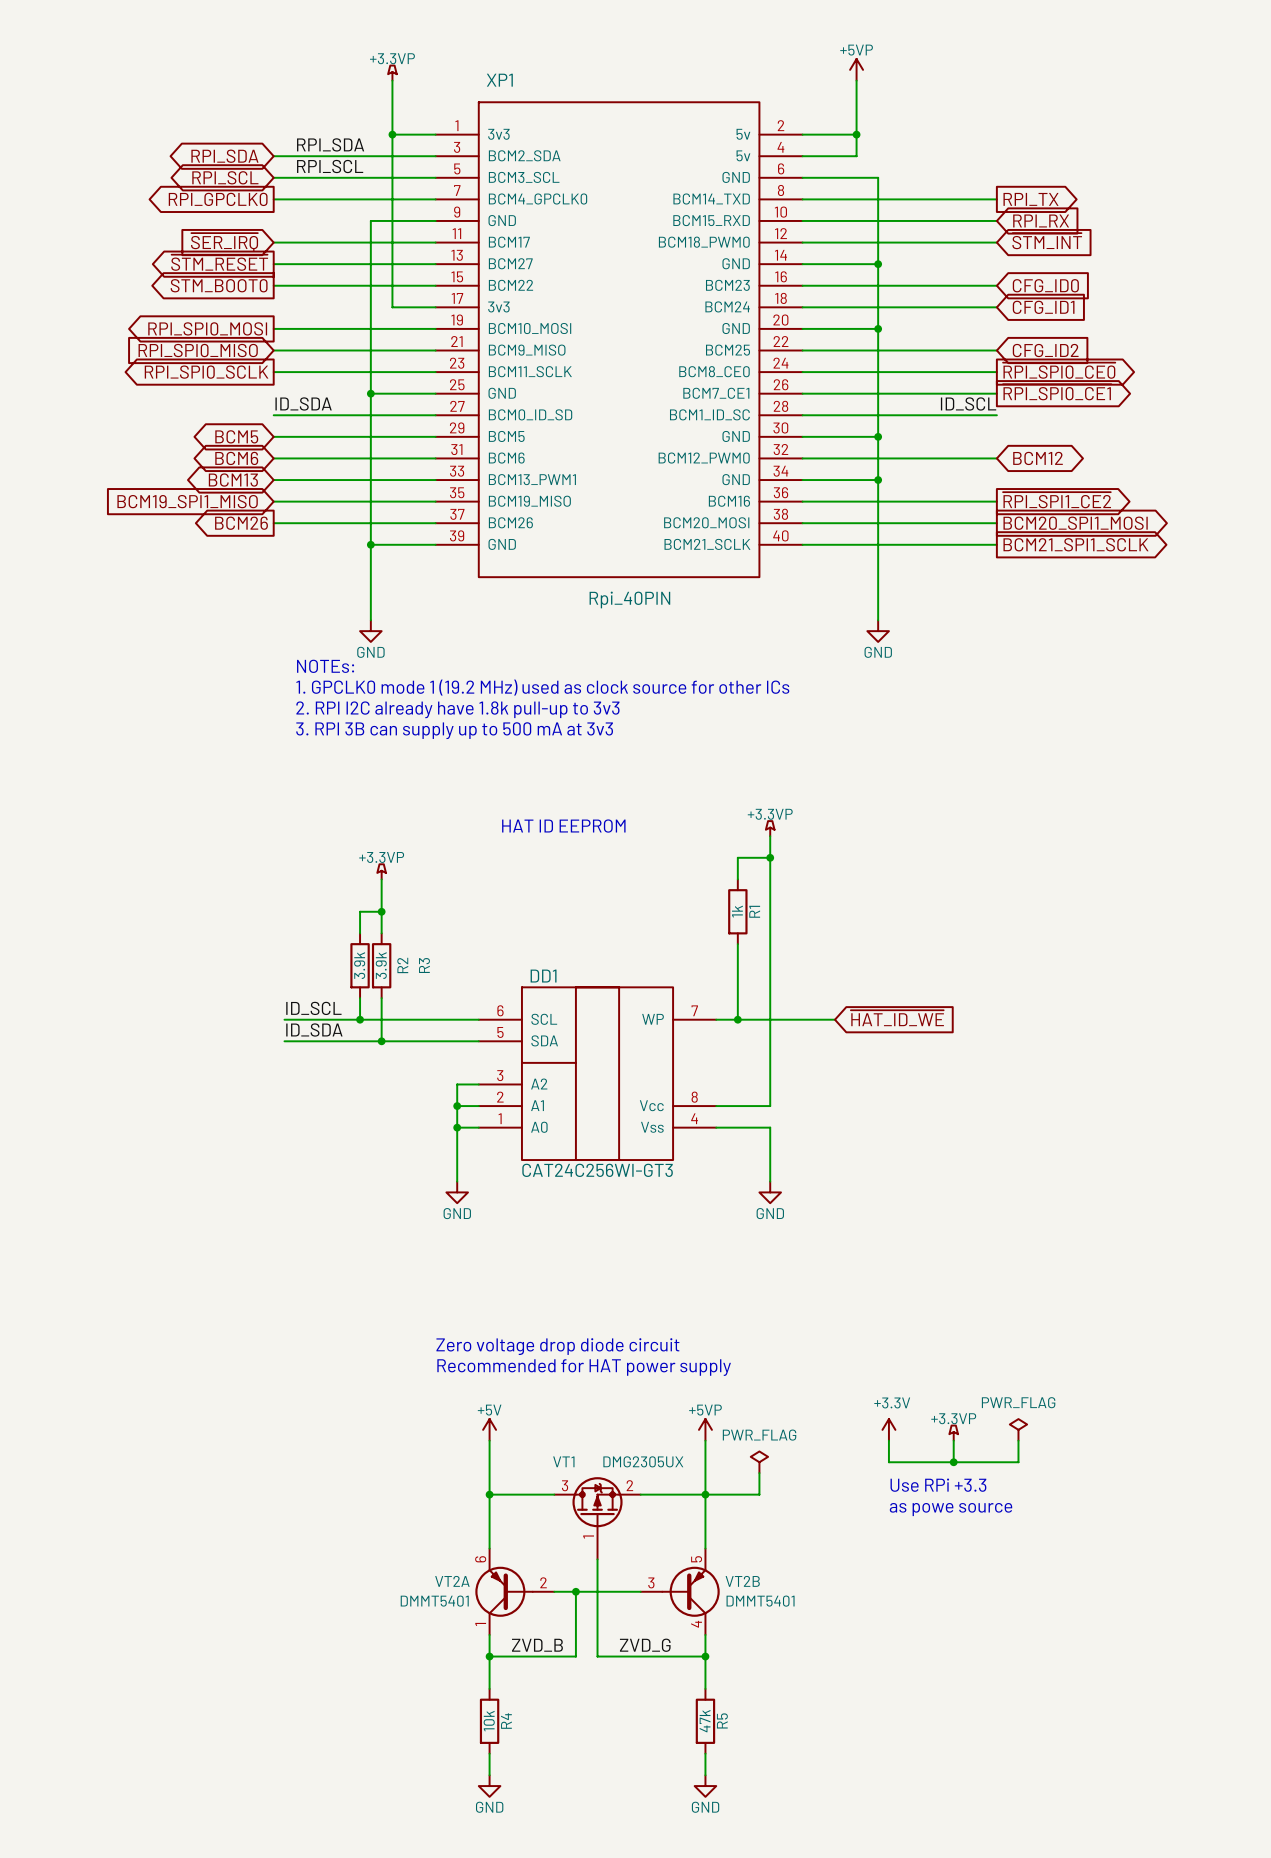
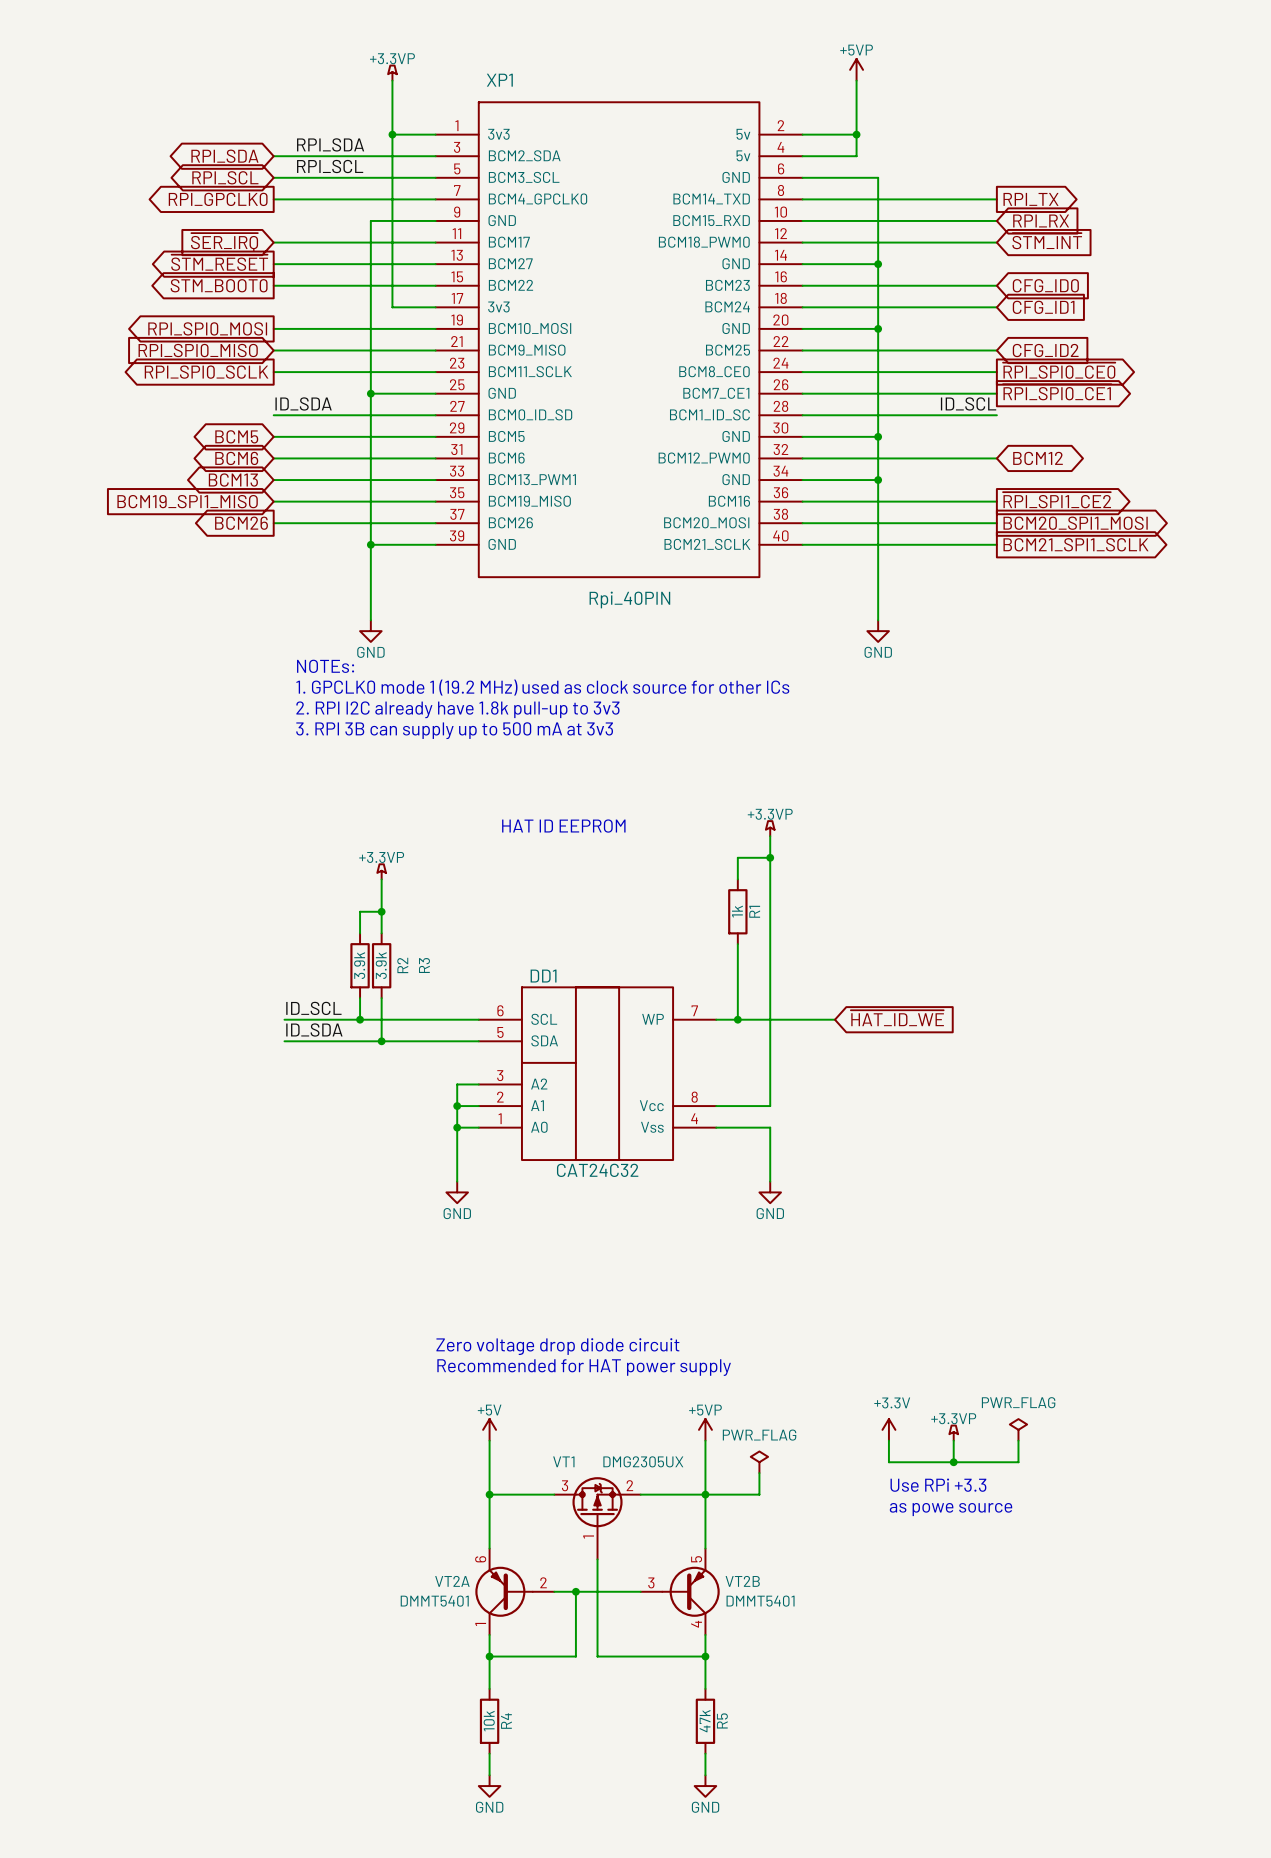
DD1 value: CAT24C256WI-GT3 (597, 1170) -> CAT24C32 (597, 1170)
label: ZVD_B (537, 1645) -> none
label: ZVD_G (645, 1645) -> none

